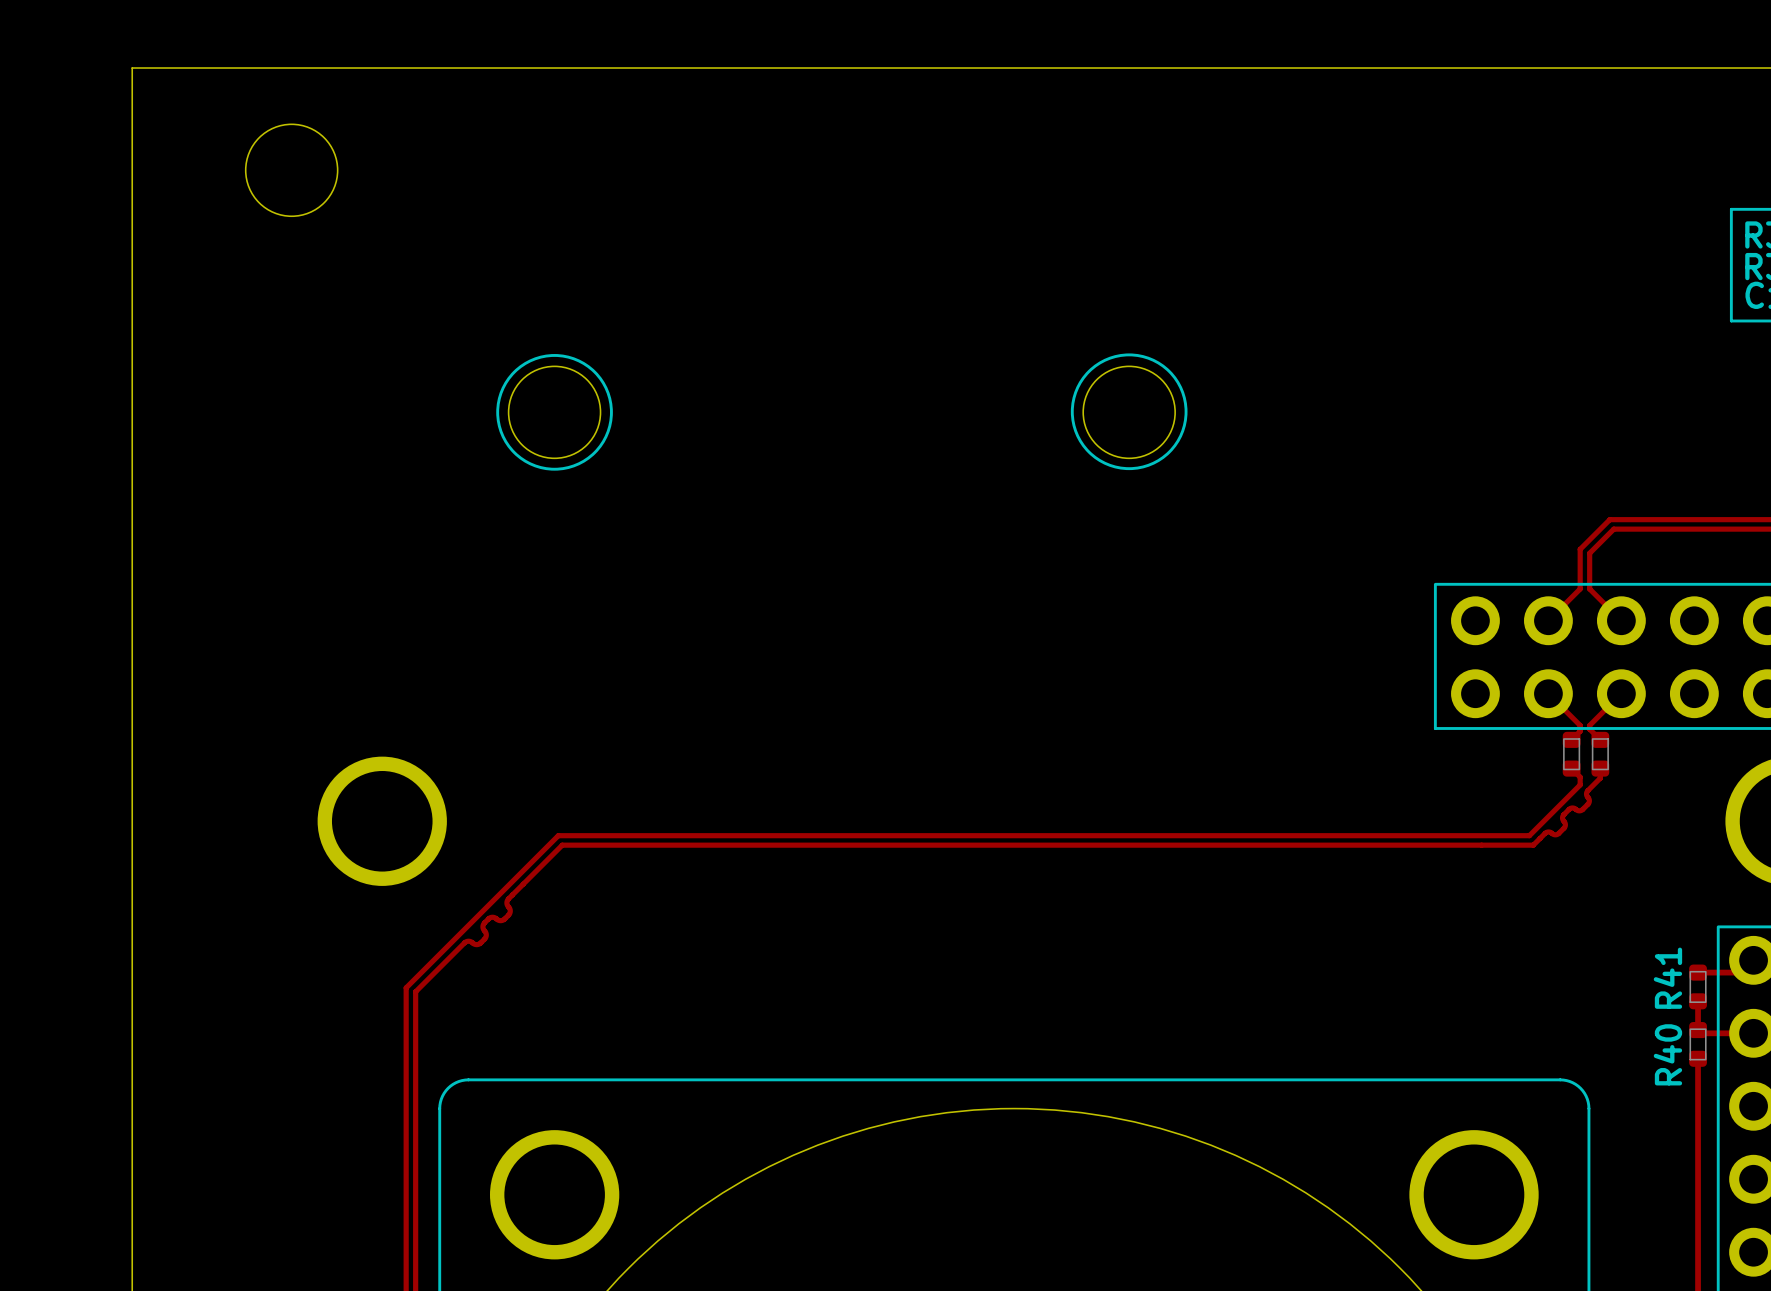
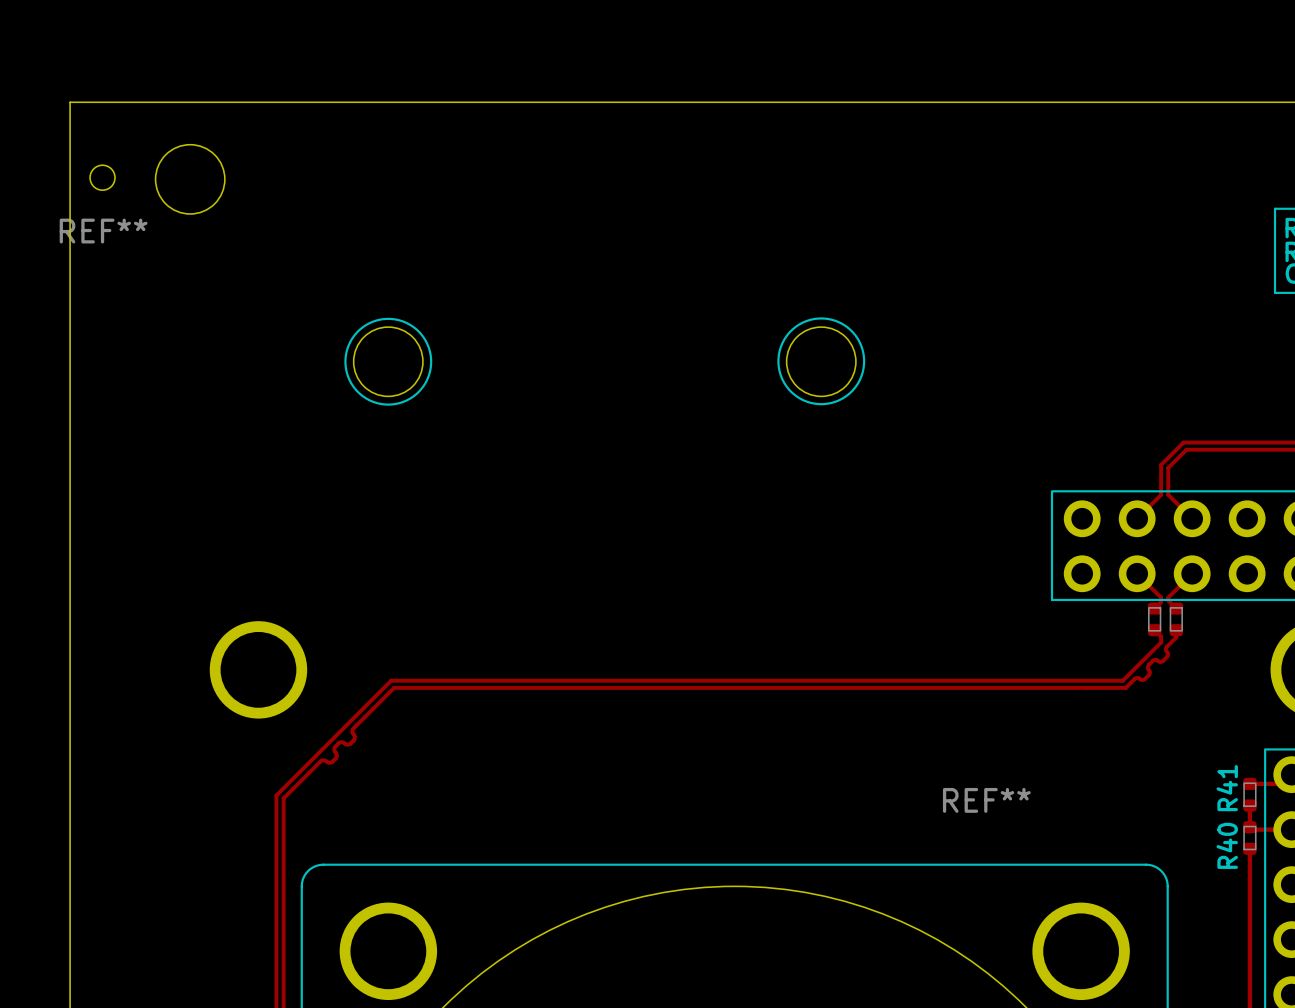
REF**: none -> (102, 177)
REF**: none -> (986, 800)

